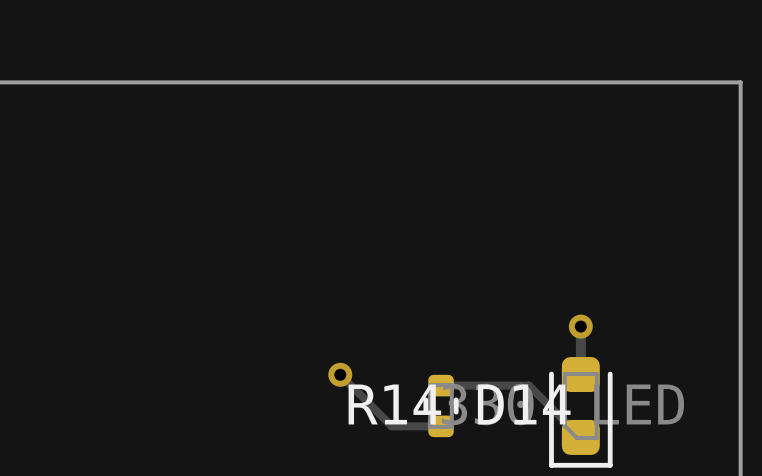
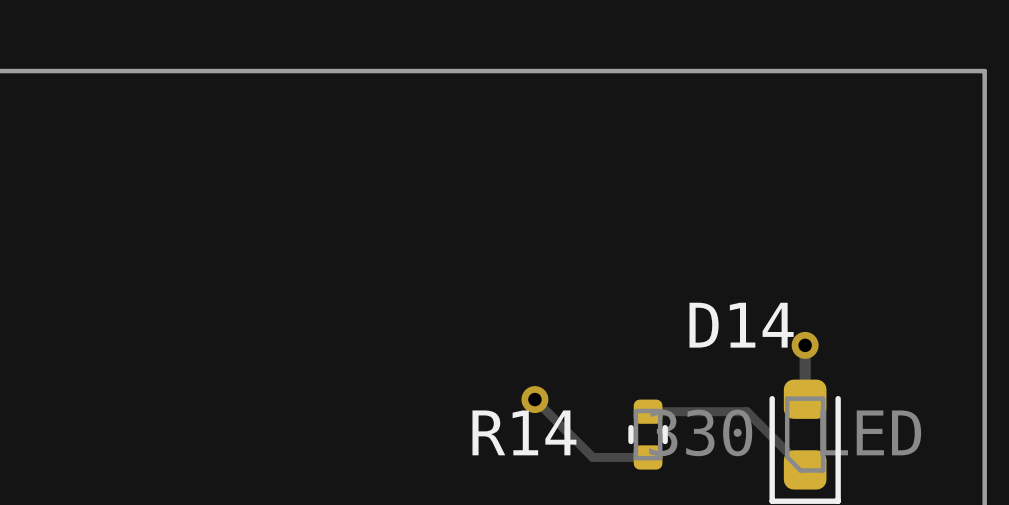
R14 name position: R14 (394, 404) -> R14 (524, 432)
D14 name position: D14 (524, 404) -> D14 (741, 325)

